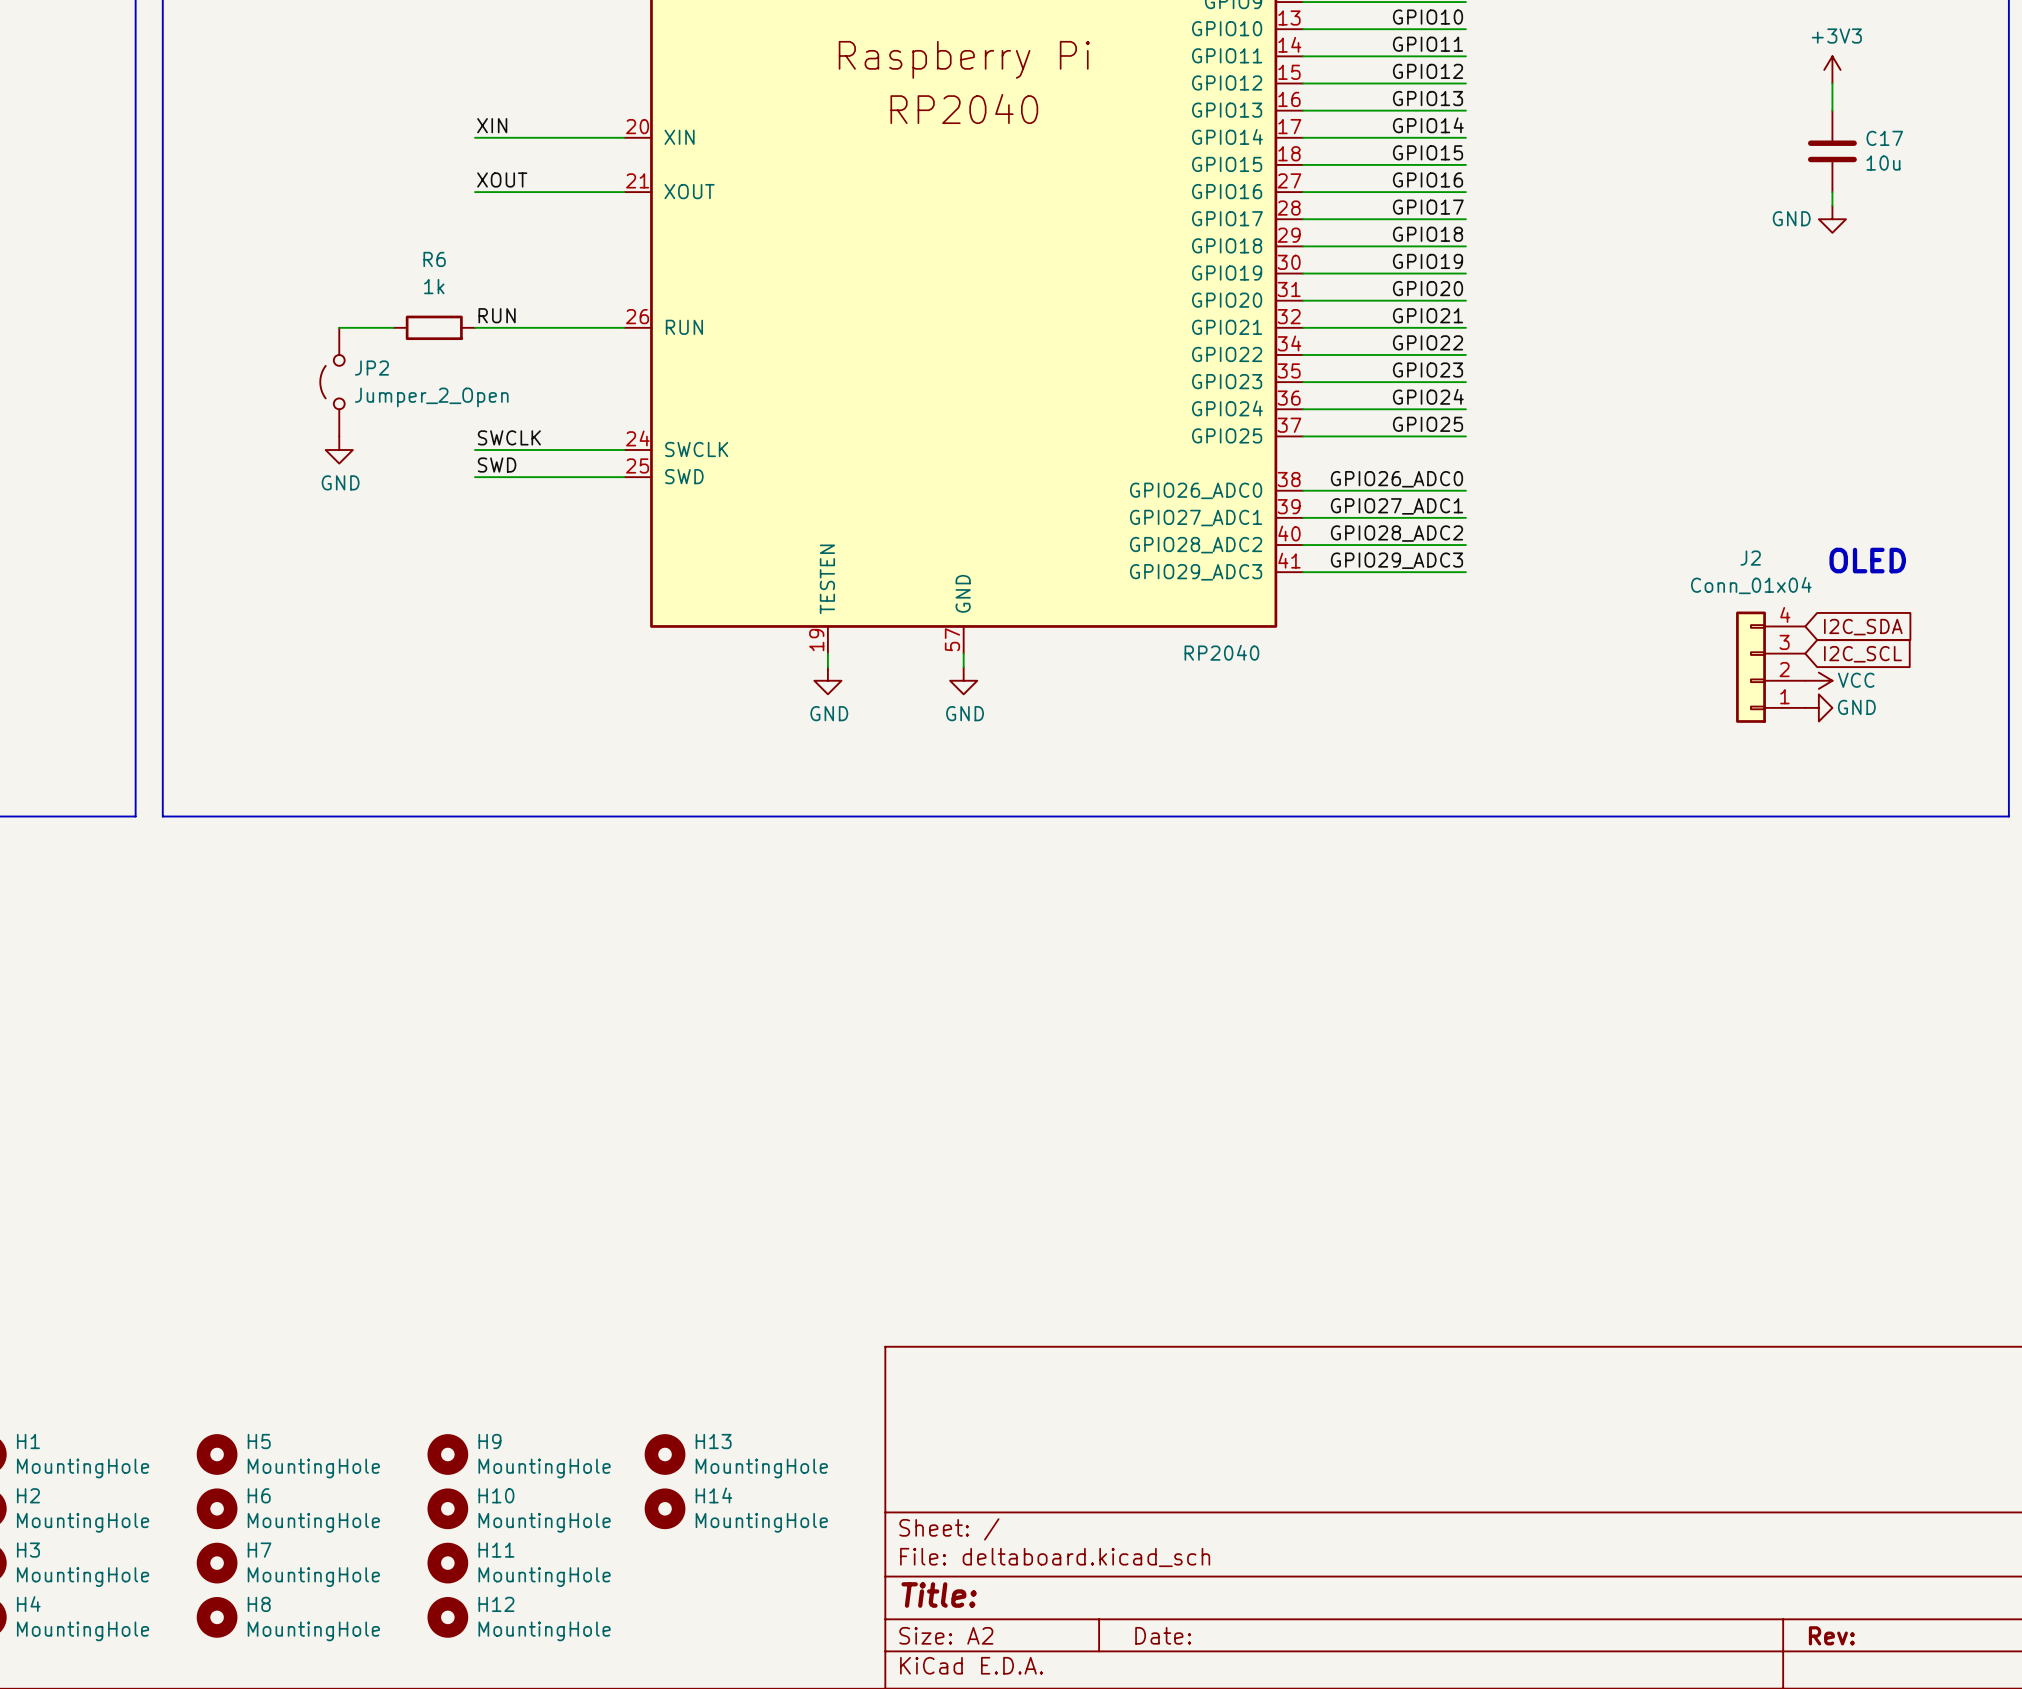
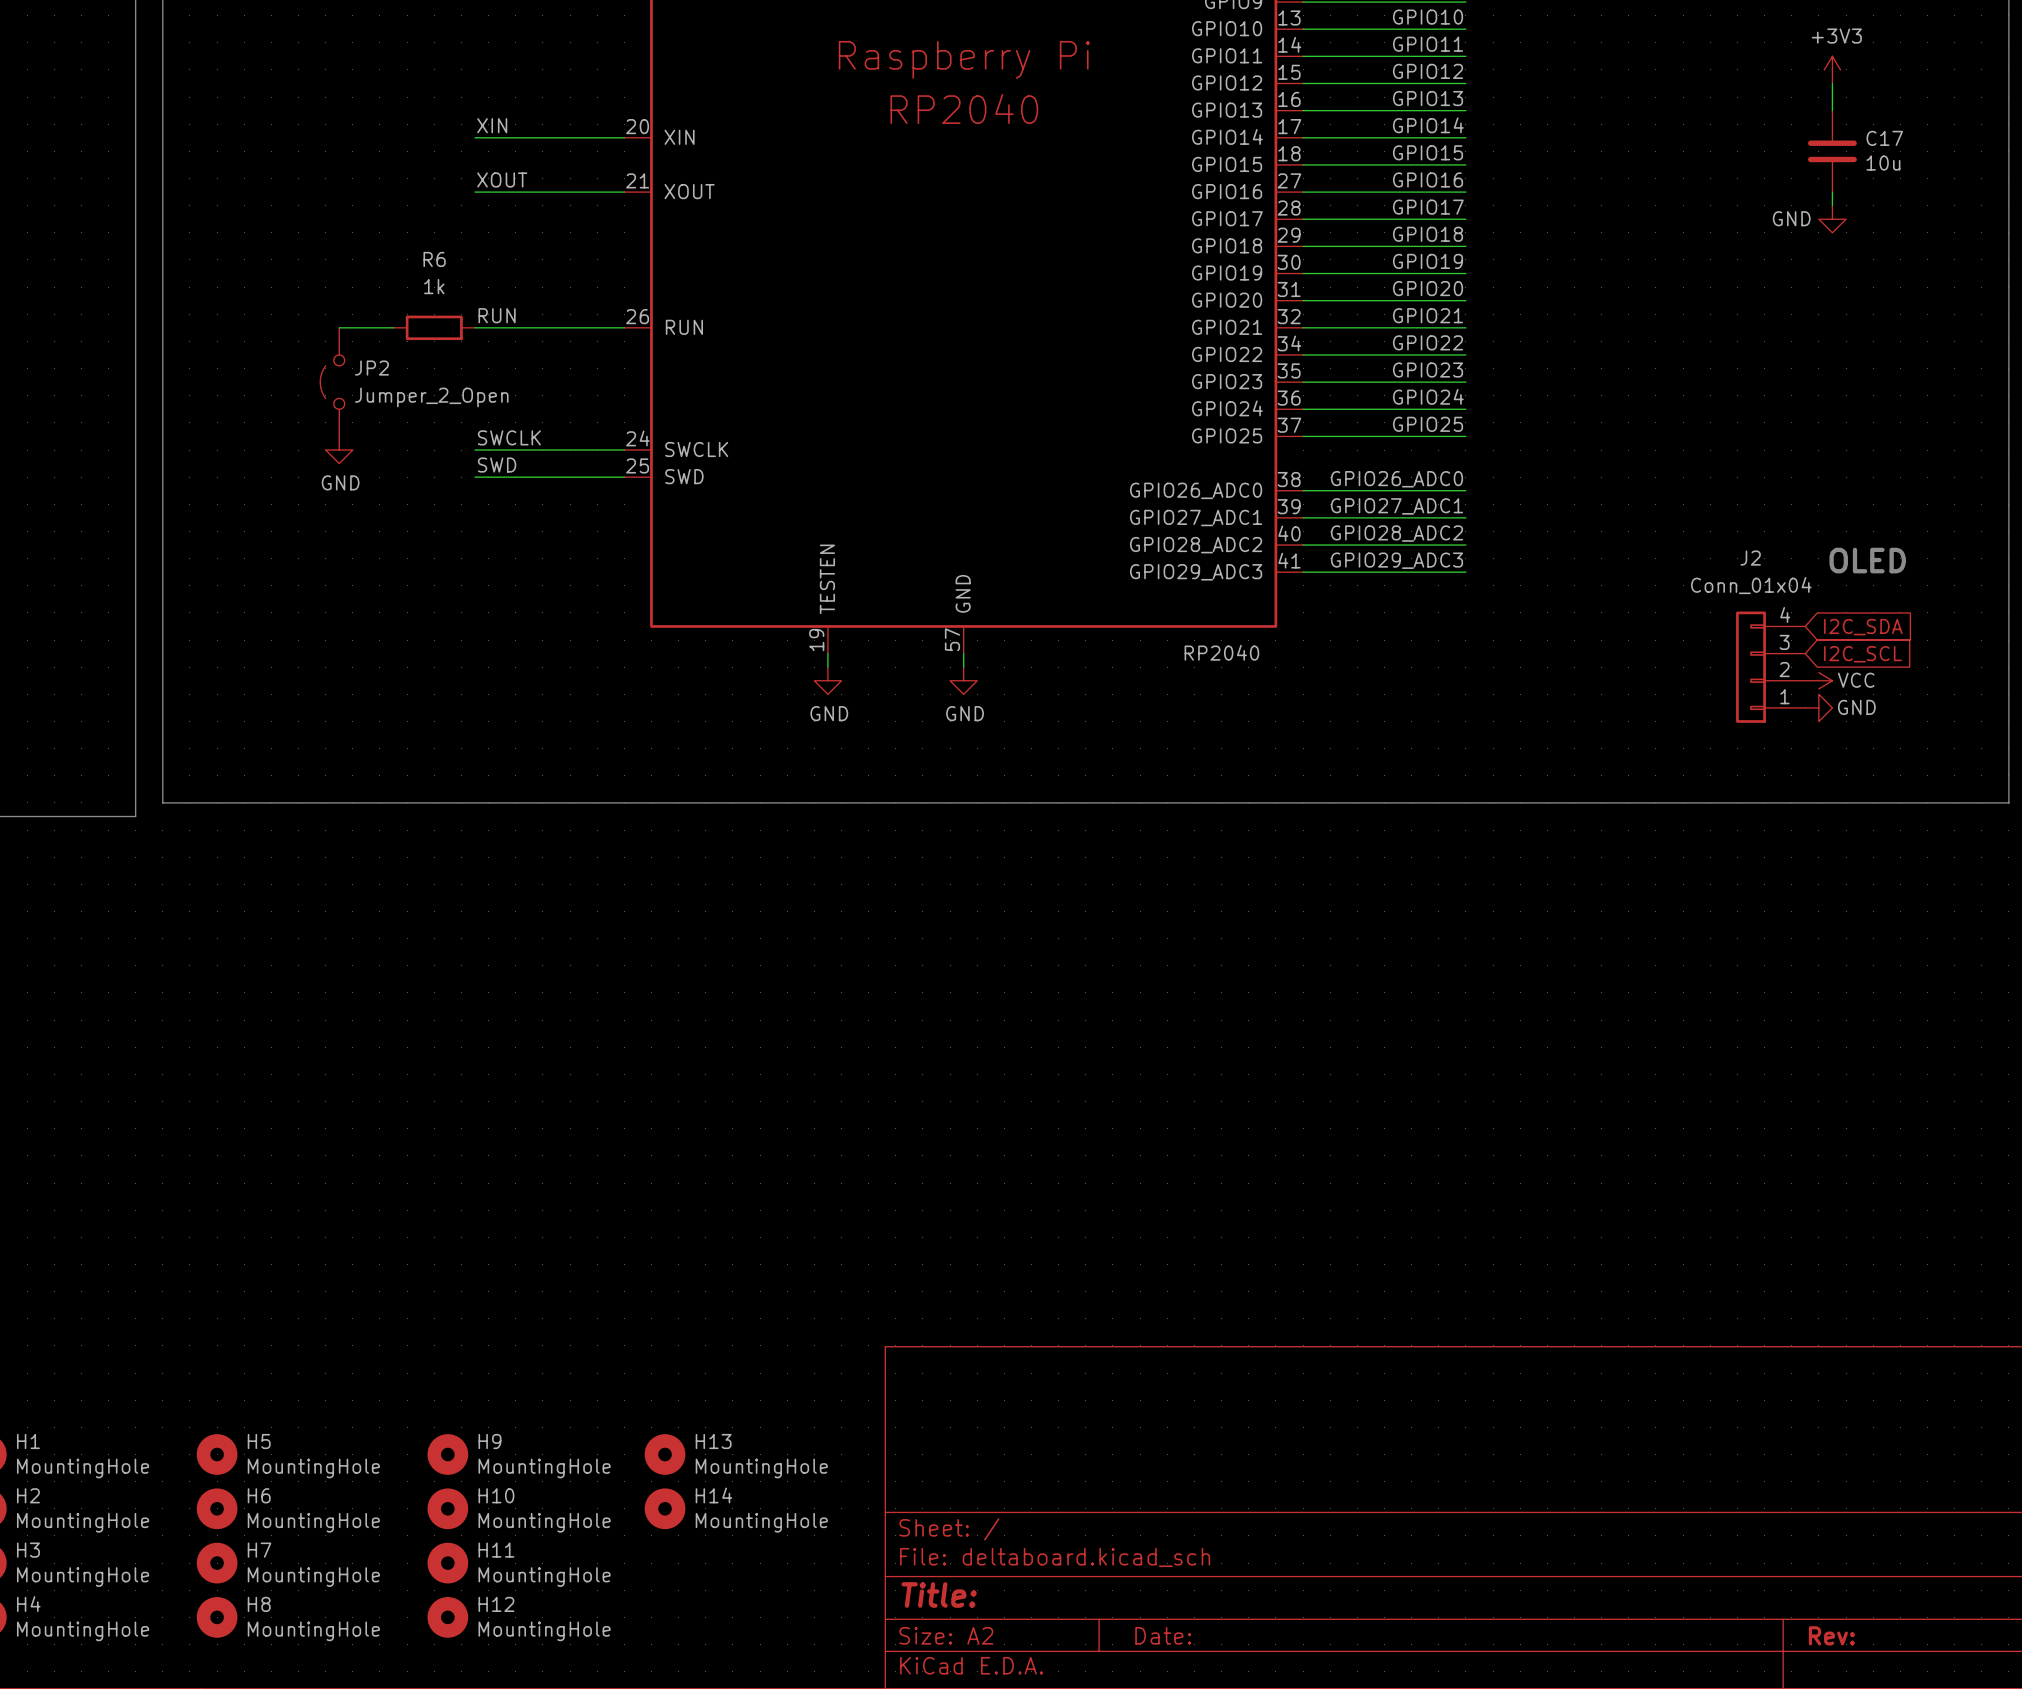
line: (162, 802) (162, 816) (2008, 816) (2008, 802) -> (162, 802) (2008, 802)

